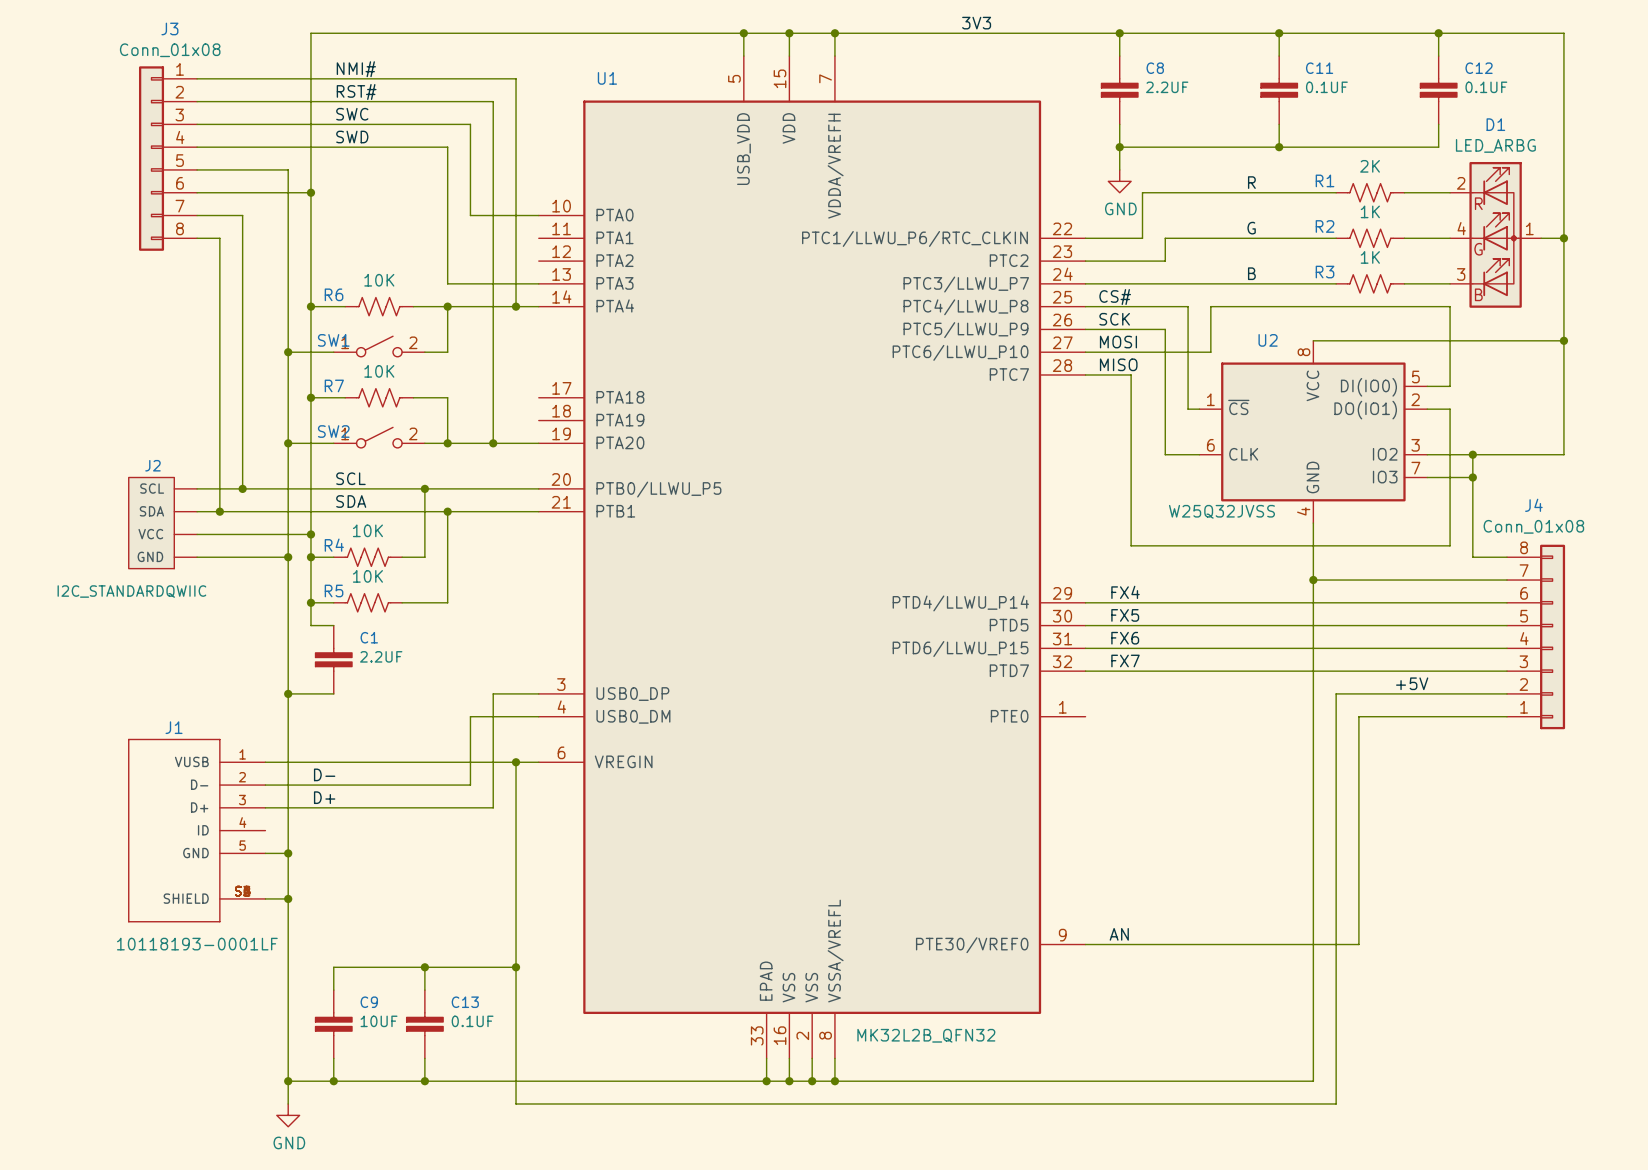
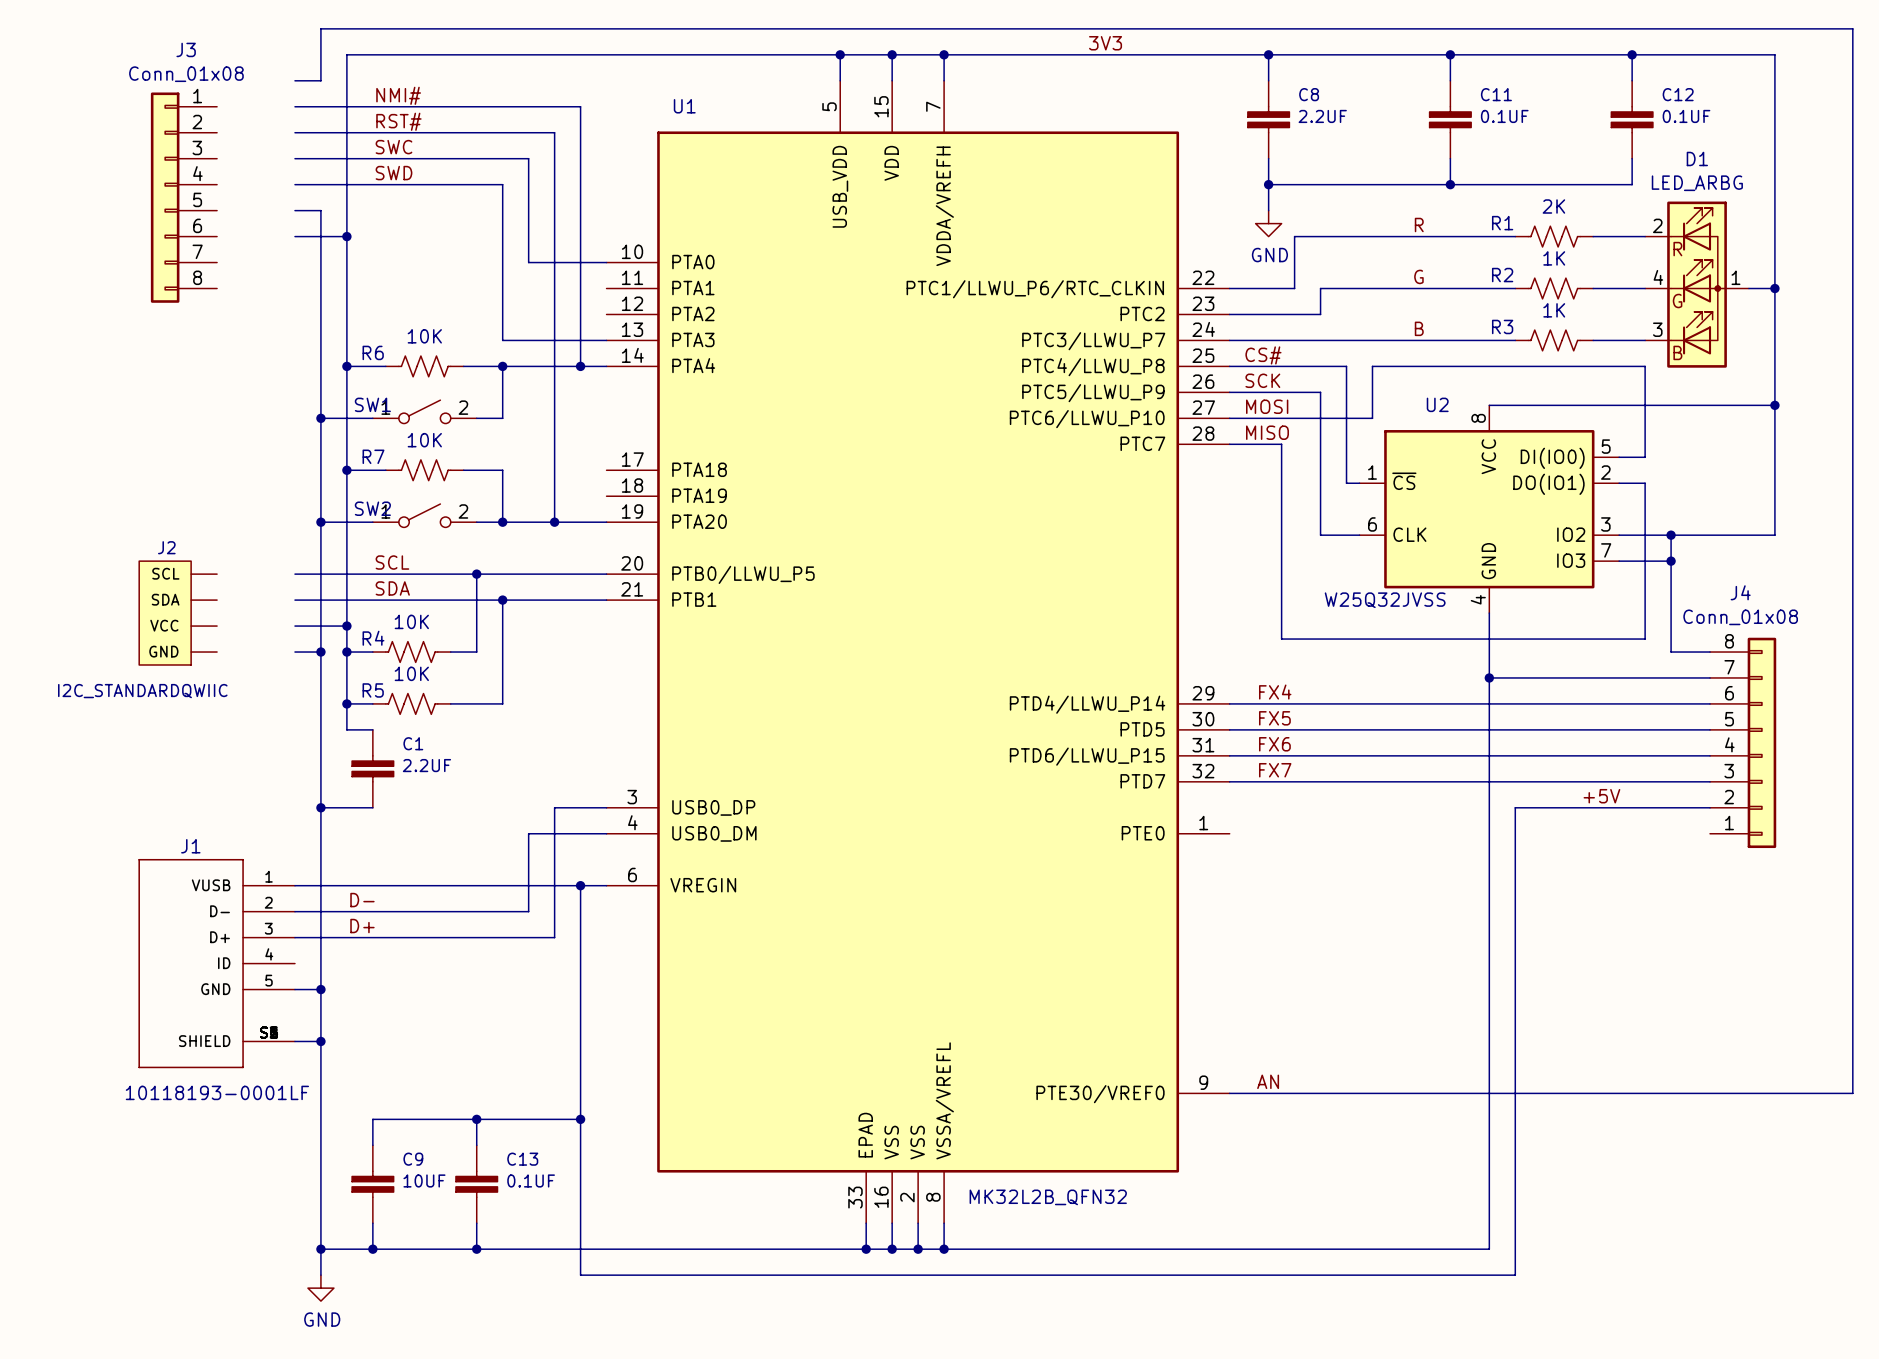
wire: (197, 78) (265, 78) -> none
wire: (197, 101) (265, 101) -> none
wire: (197, 124) (265, 124) -> none
wire: (197, 147) (265, 147) -> none
wire: (197, 169) (265, 169) -> none
wire: (197, 192) (265, 192) -> none
wire: (197, 215) (242, 215) (242, 488) -> none
wire: (197, 238) (219, 238) (219, 511) -> none
wire: (197, 488) (265, 488) -> none
junction: (242, 488) -> none
wire: (197, 511) (265, 511) -> none
junction: (219, 511) -> none
wire: (197, 534) (265, 534) -> none
wire: (197, 557) (265, 557) -> none
wire: (1507, 716) (1358, 716) (1358, 944) -> (294, 80) (320, 80) (320, 28) (1852, 28) (1852, 1093) (1541, 1093)

